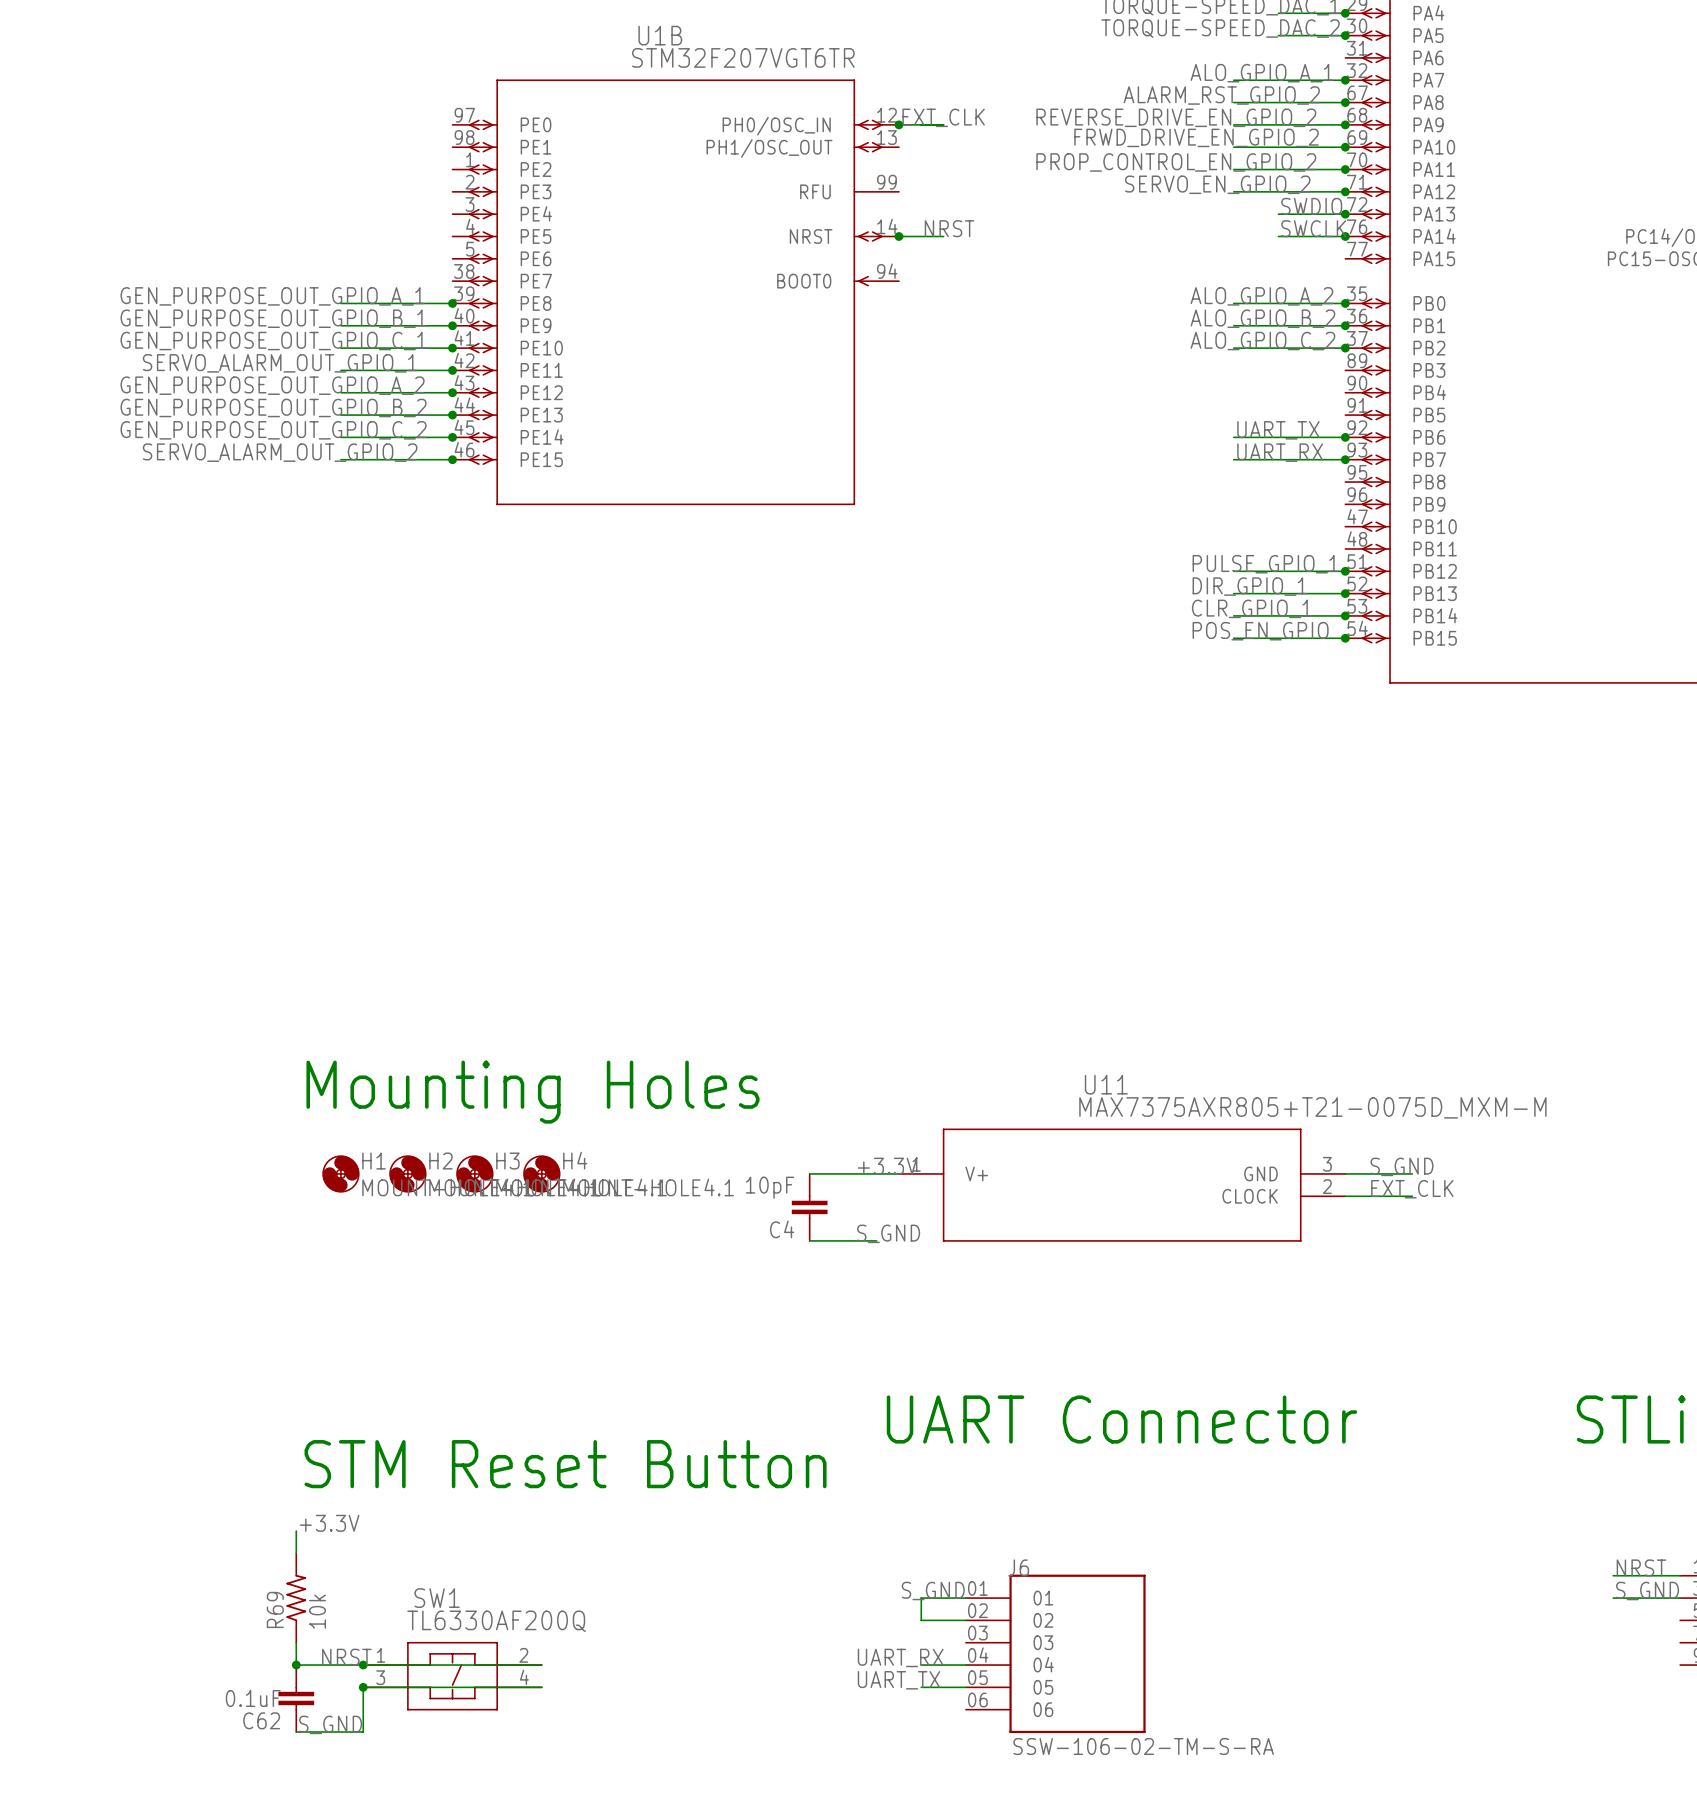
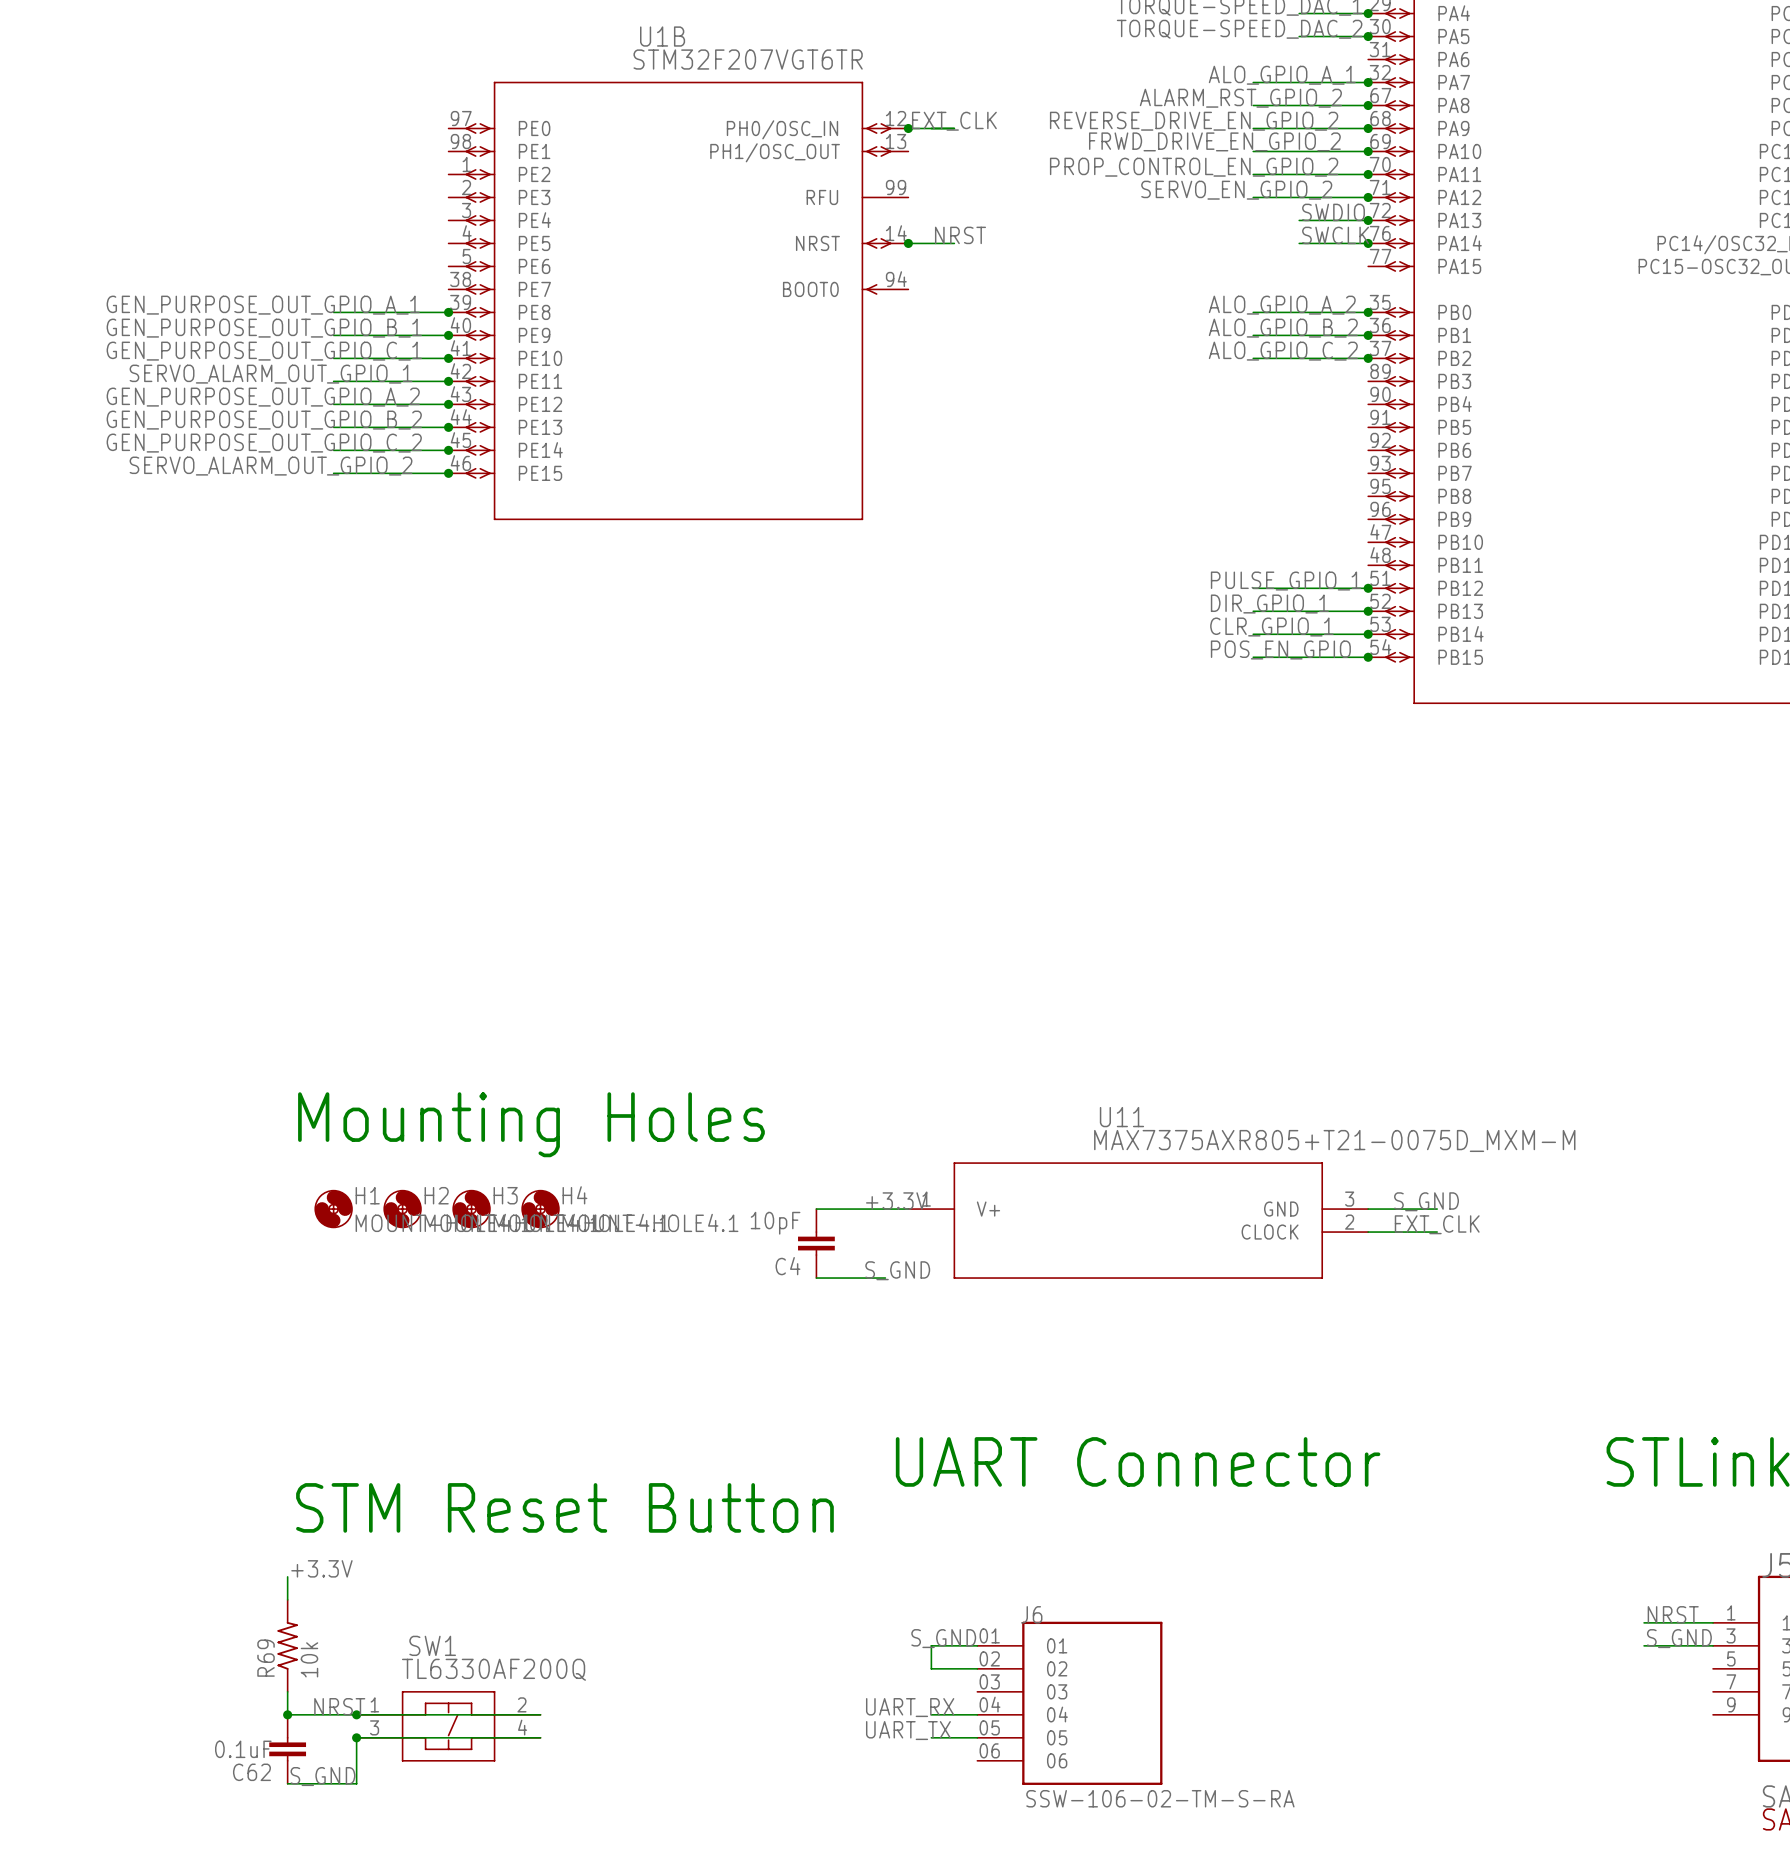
label: UART_TX (1278, 430) -> none
wire: (1233, 437) (1345, 437) -> none
junction: (1345, 437) -> none
label: UART_RX (1280, 452) -> none
wire: (1233, 459) (1345, 459) -> none
junction: (1345, 459) -> none

